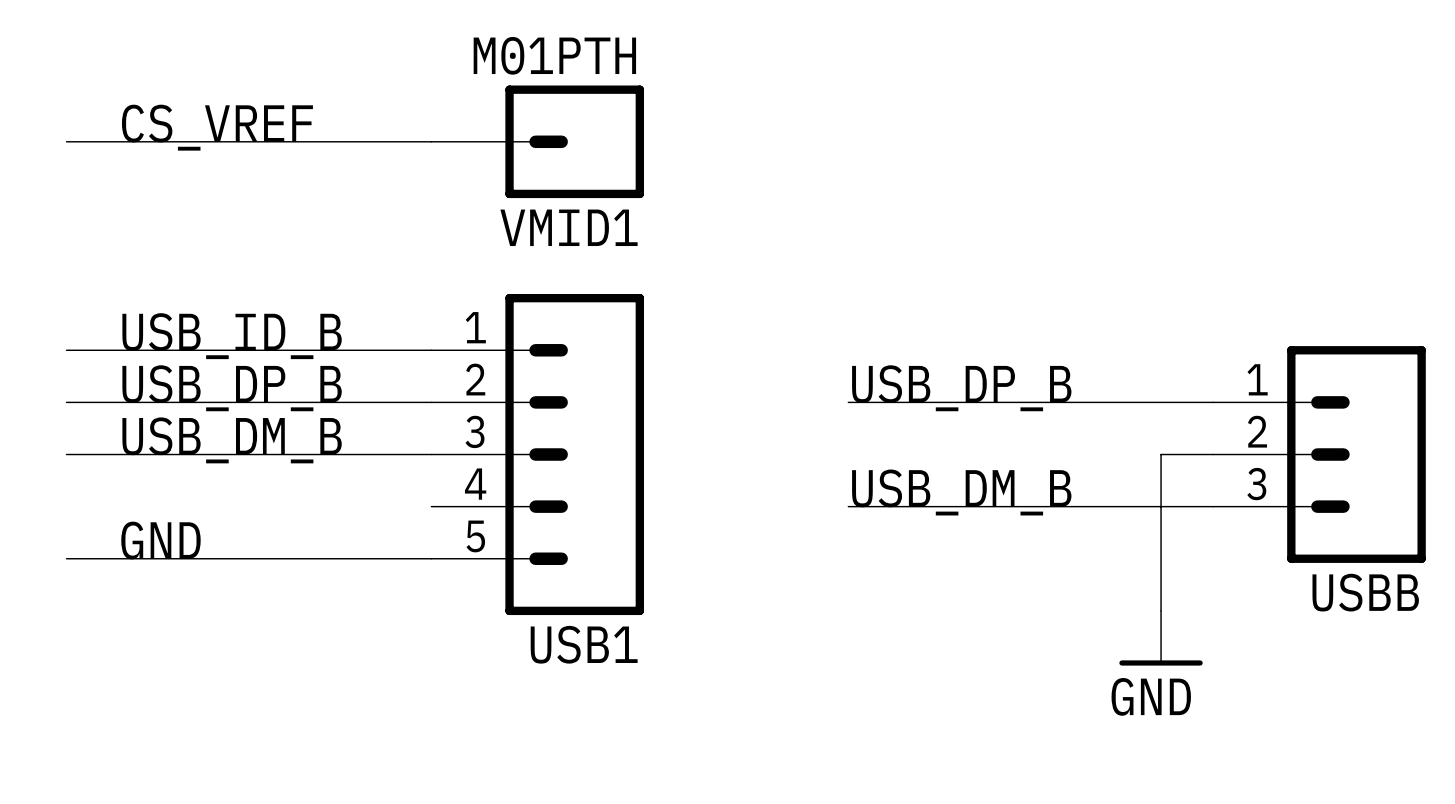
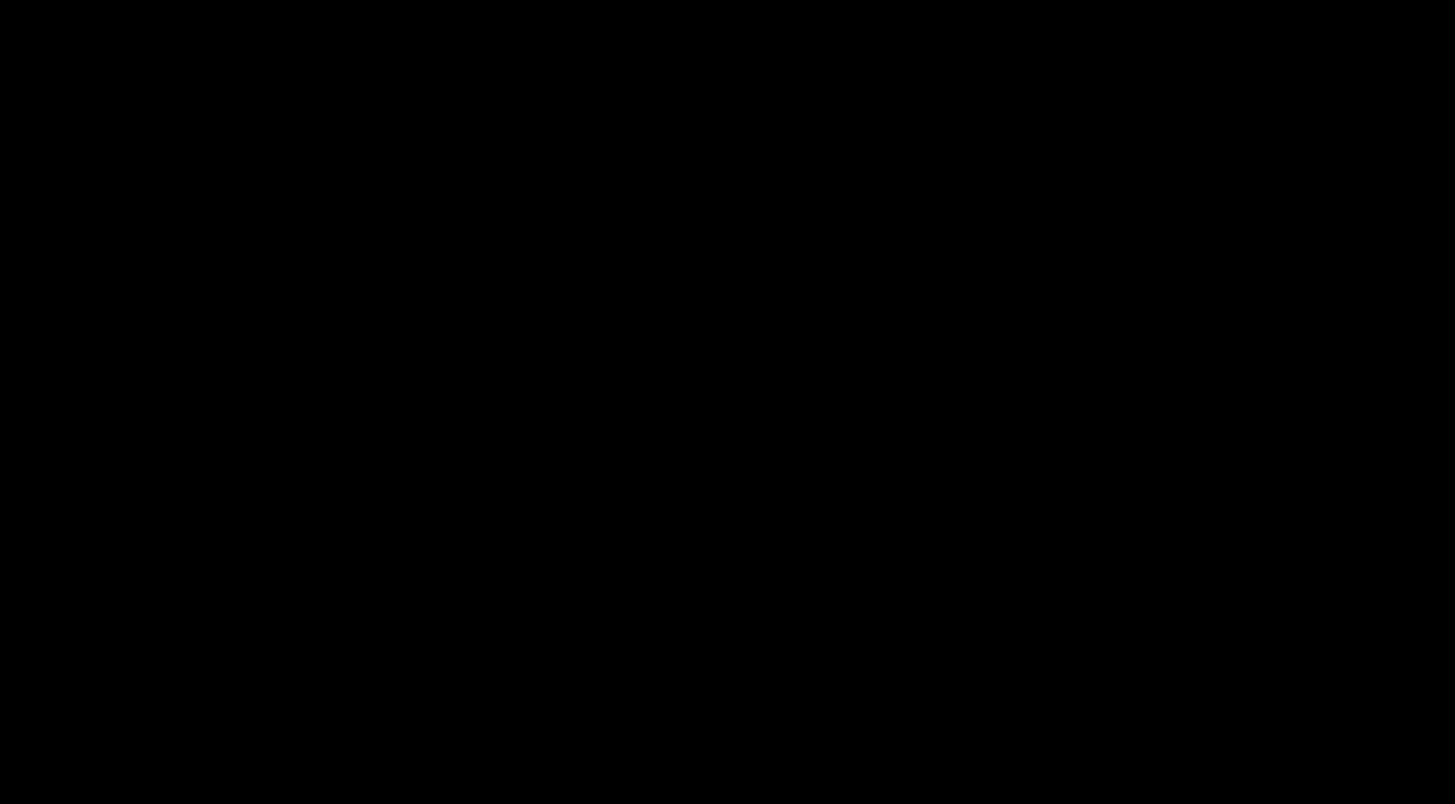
label: CS_VREF (217, 127) -> none
wire: (66, 141) (431, 141) -> none
VMID1: M01PTH (537, 141) -> none
label: USB_ID_B (232, 336) -> none
wire: (66, 350) (431, 350) -> none
label: USB_DP_B (232, 388) -> none
label: USB_DP_B (961, 388) -> none
wire: (66, 402) (431, 402) -> none
wire: (848, 402) (1213, 402) -> none
label: USB_DM_B (232, 440) -> none
wire: (66, 454) (431, 454) -> none
USB1: (537, 454) -> none
wire: (1213, 454) (1161, 454) (1161, 610) -> none
USBB: (1319, 454) -> none
label: USB_DM_B (961, 492) -> none
wire: (848, 506) (1213, 506) -> none
label: GND (160, 540) -> none
wire: (66, 558) (431, 558) -> none
power symbol: GND (1161, 638) -> none

